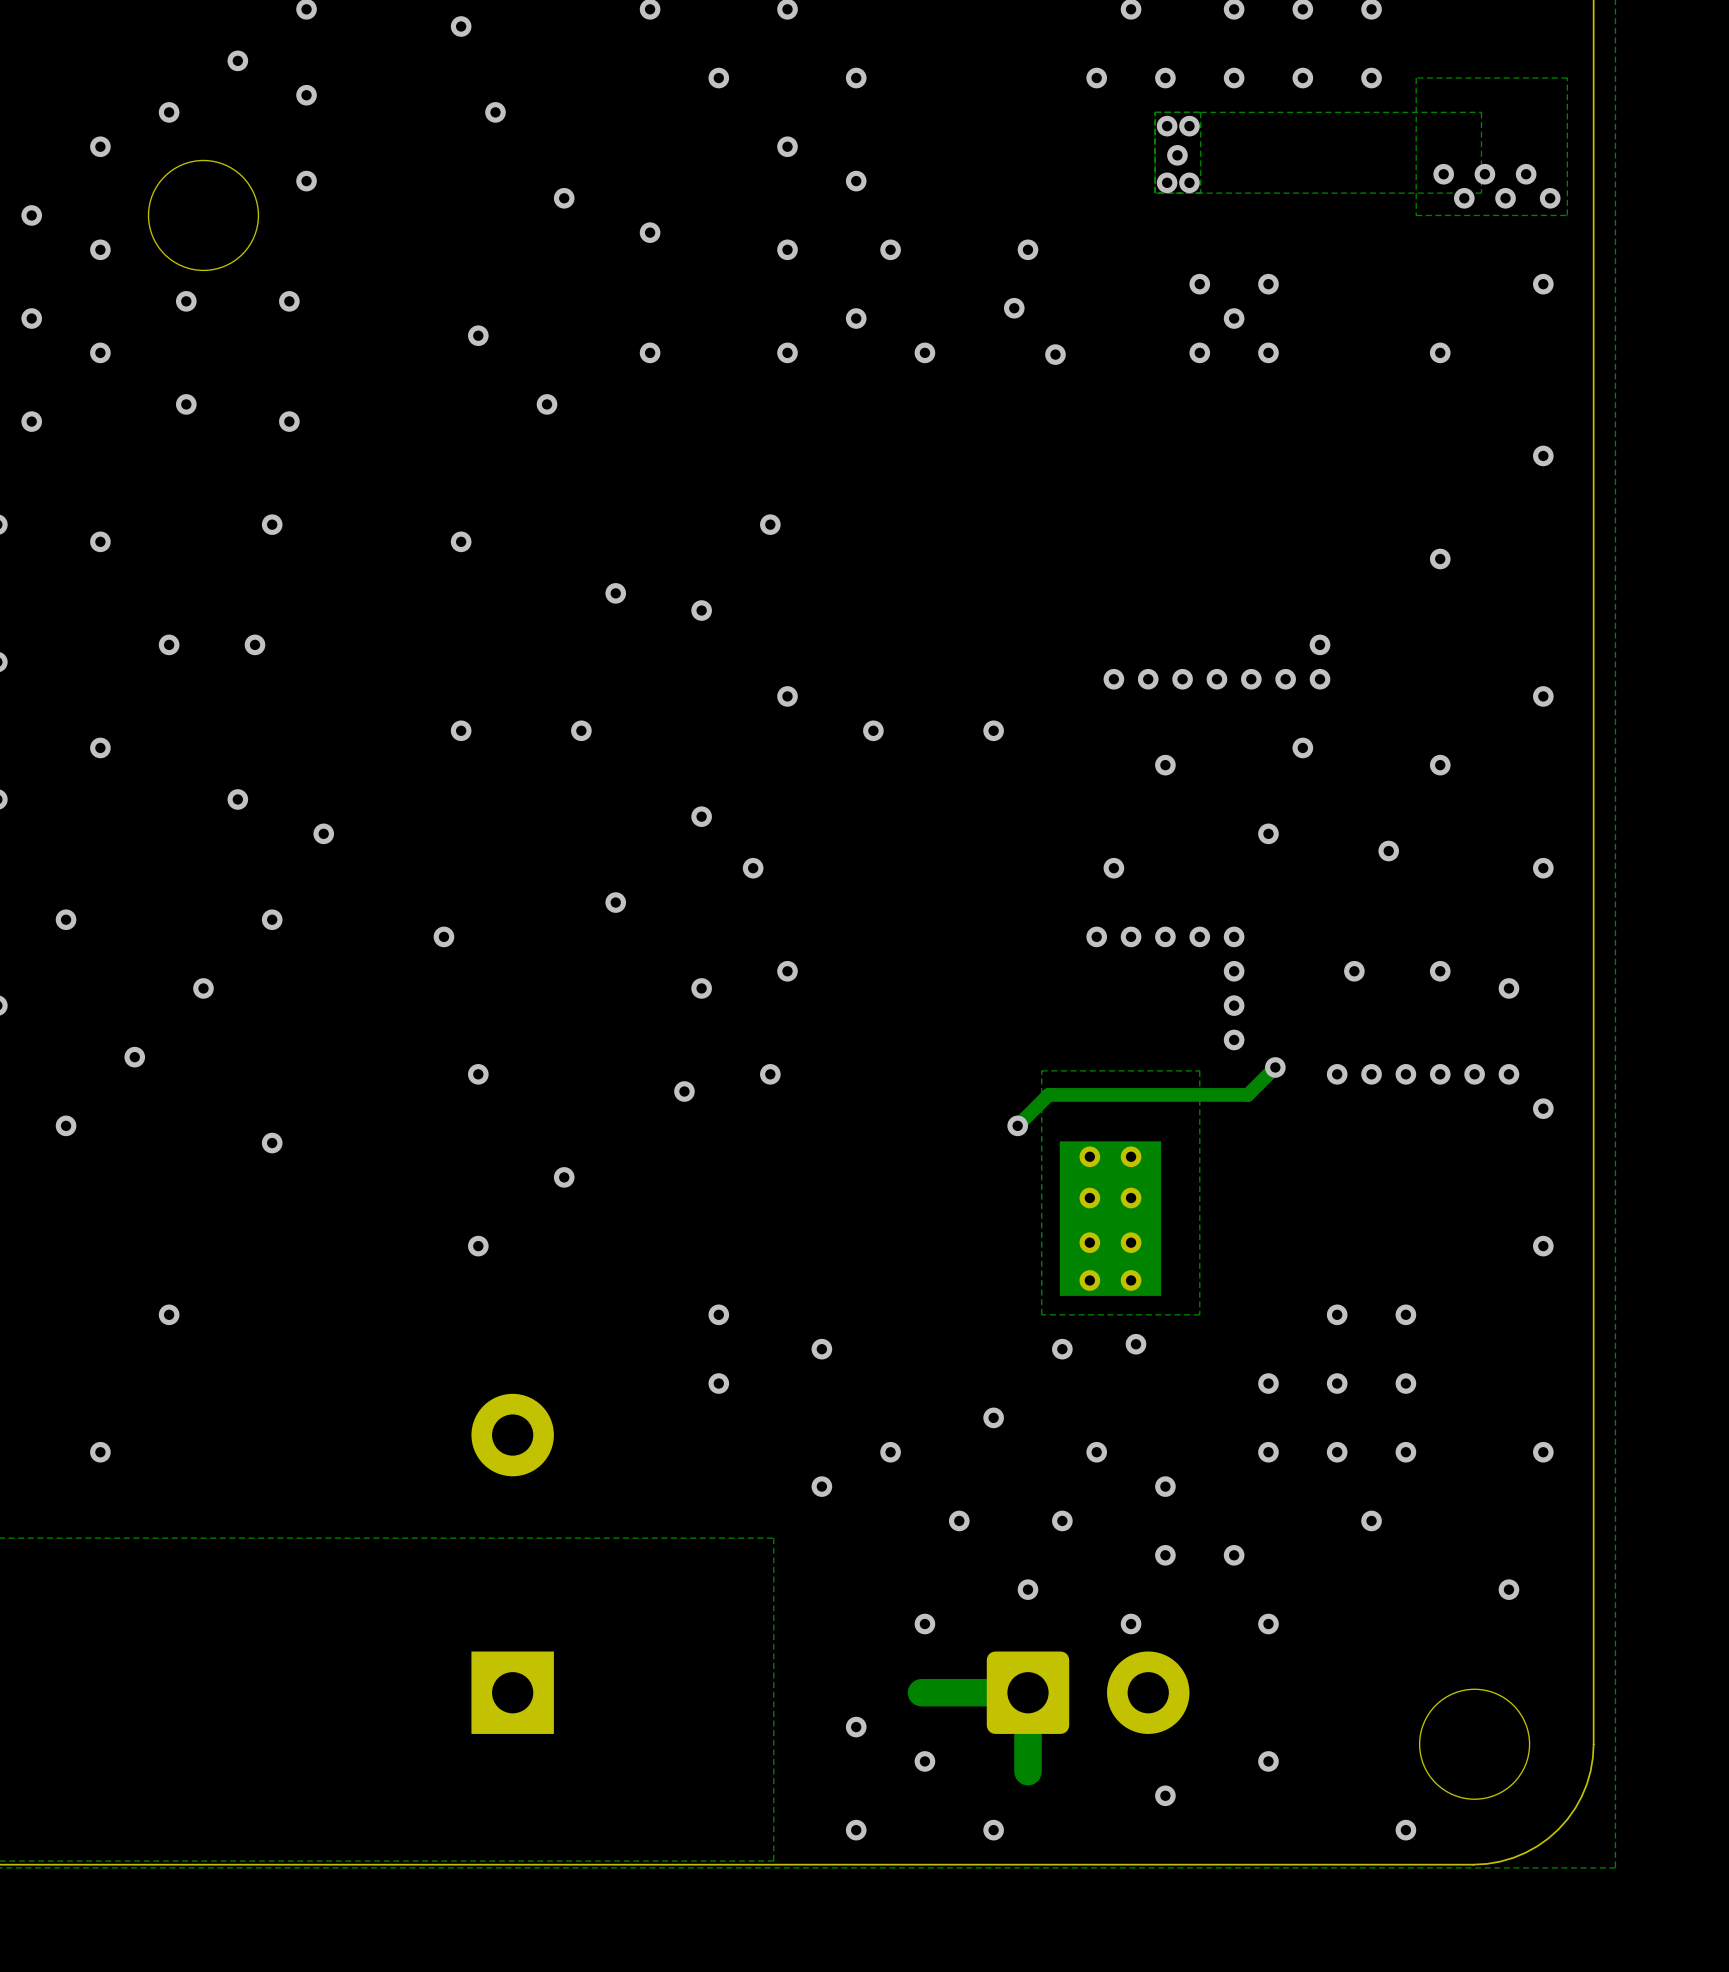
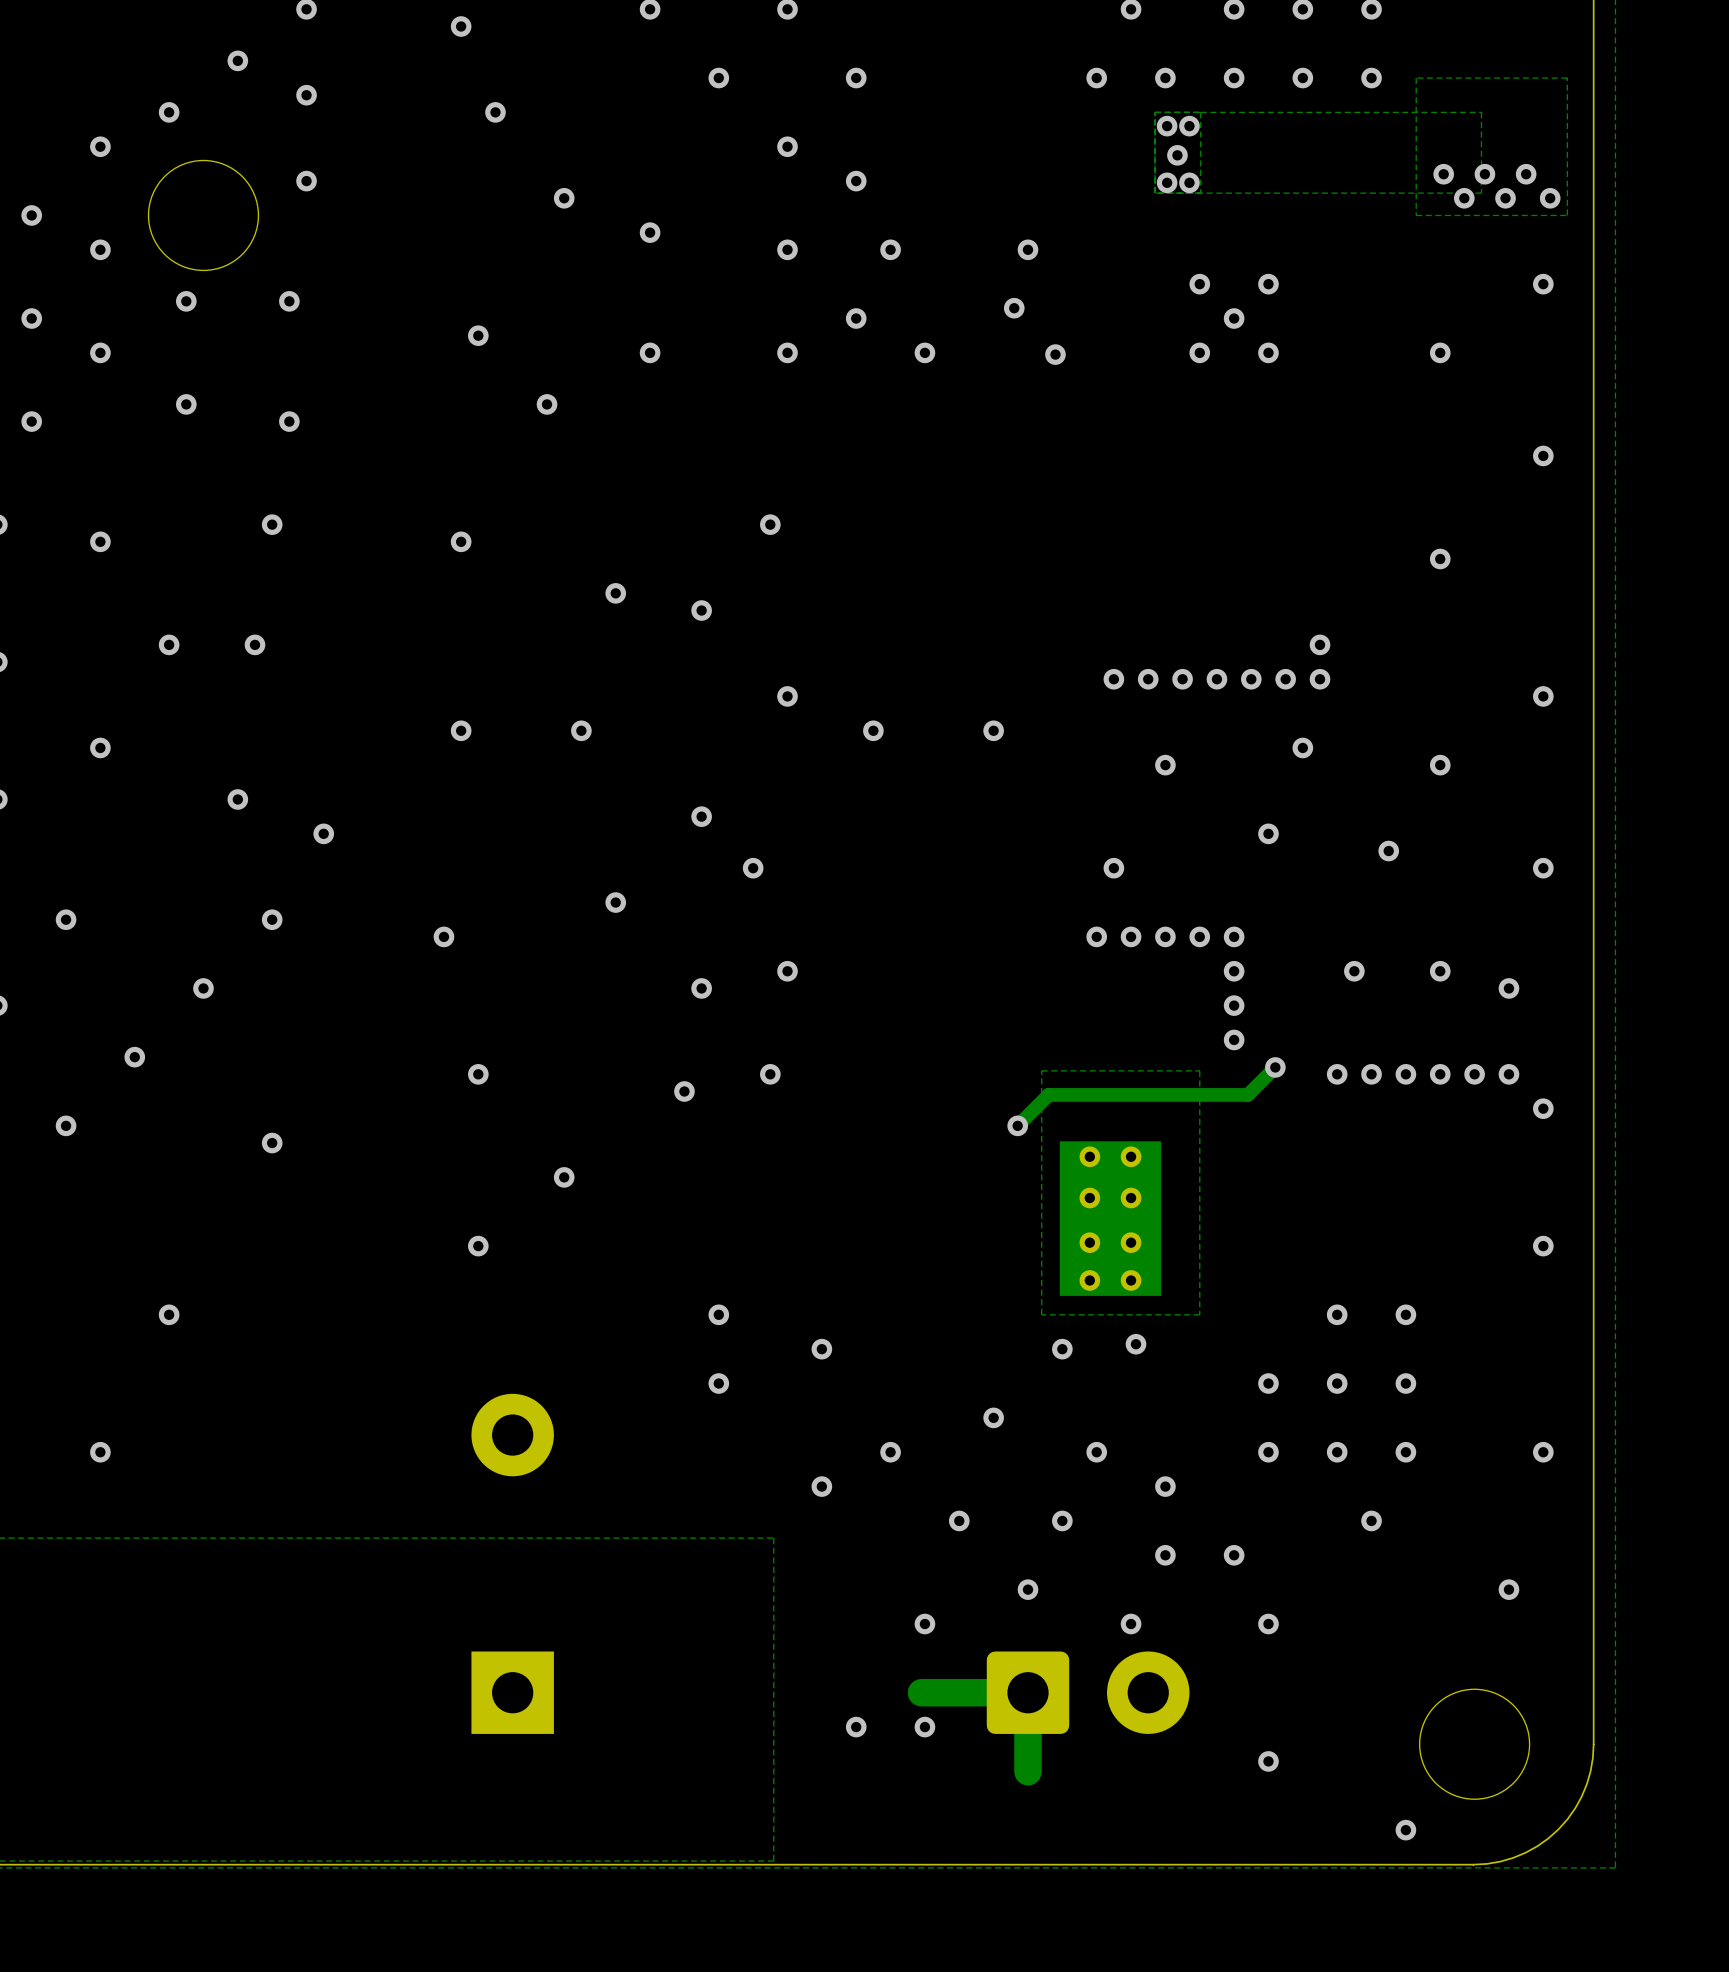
via position: (924, 1761) -> (924, 1727)
via: (1165, 1795) -> none
via: (856, 1830) -> none
via: (993, 1830) -> none

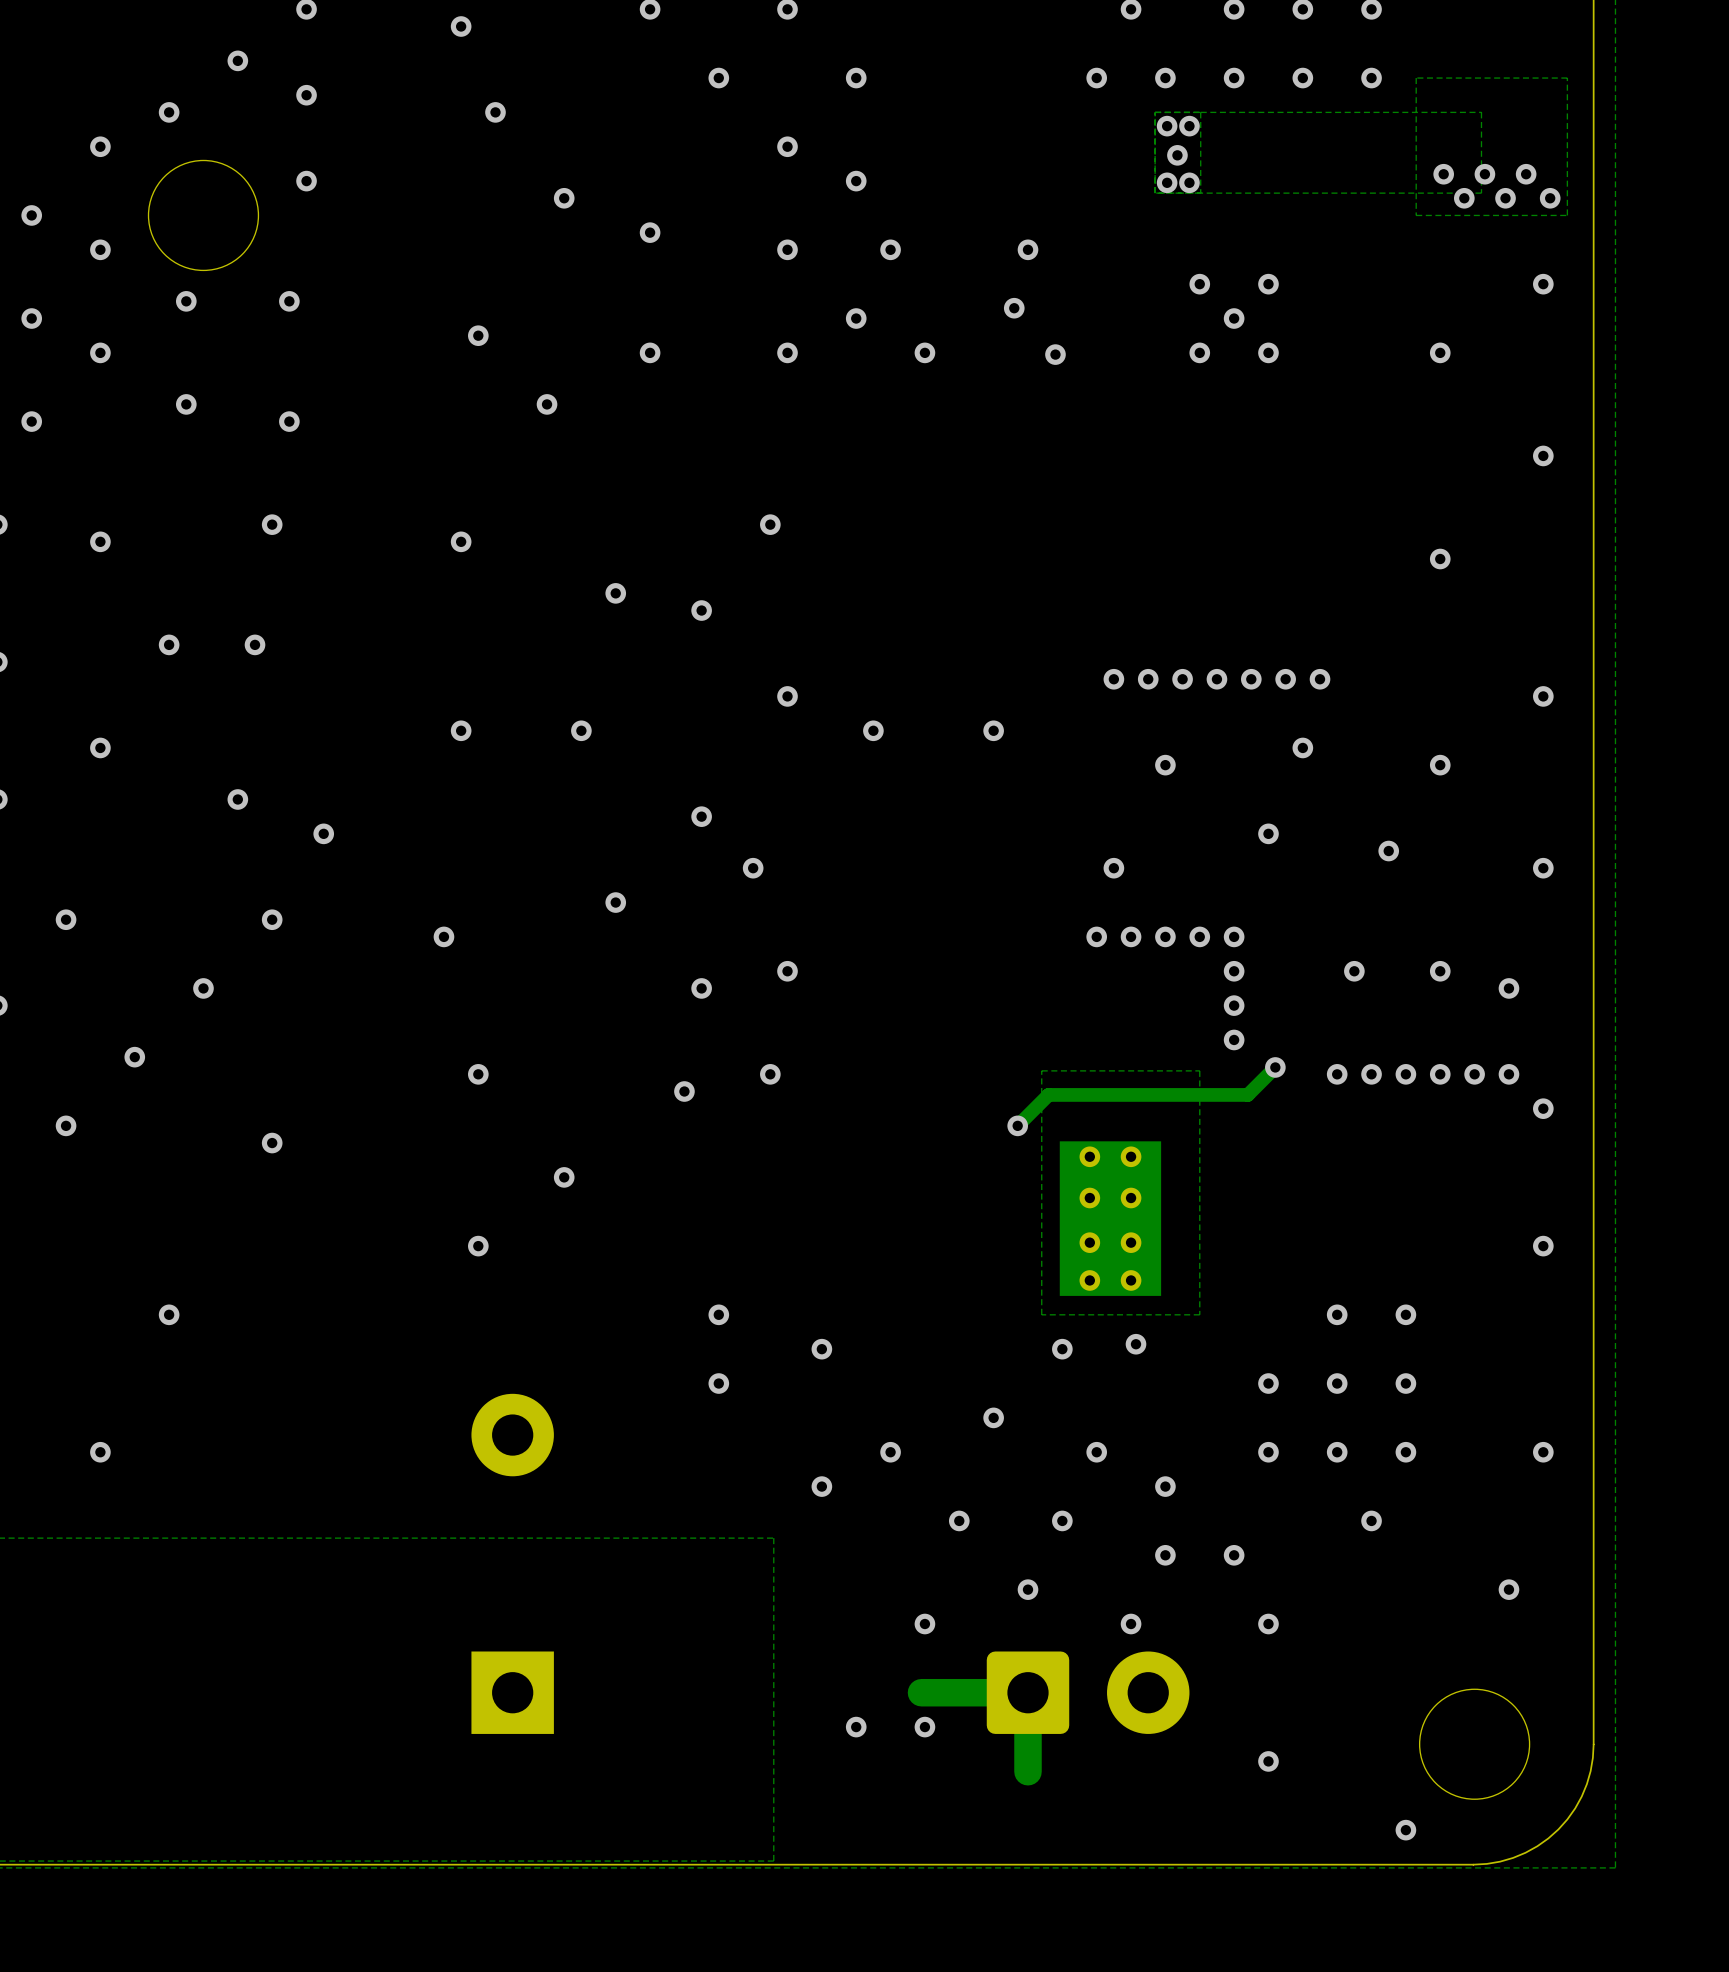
via: (1320, 644) -> none

